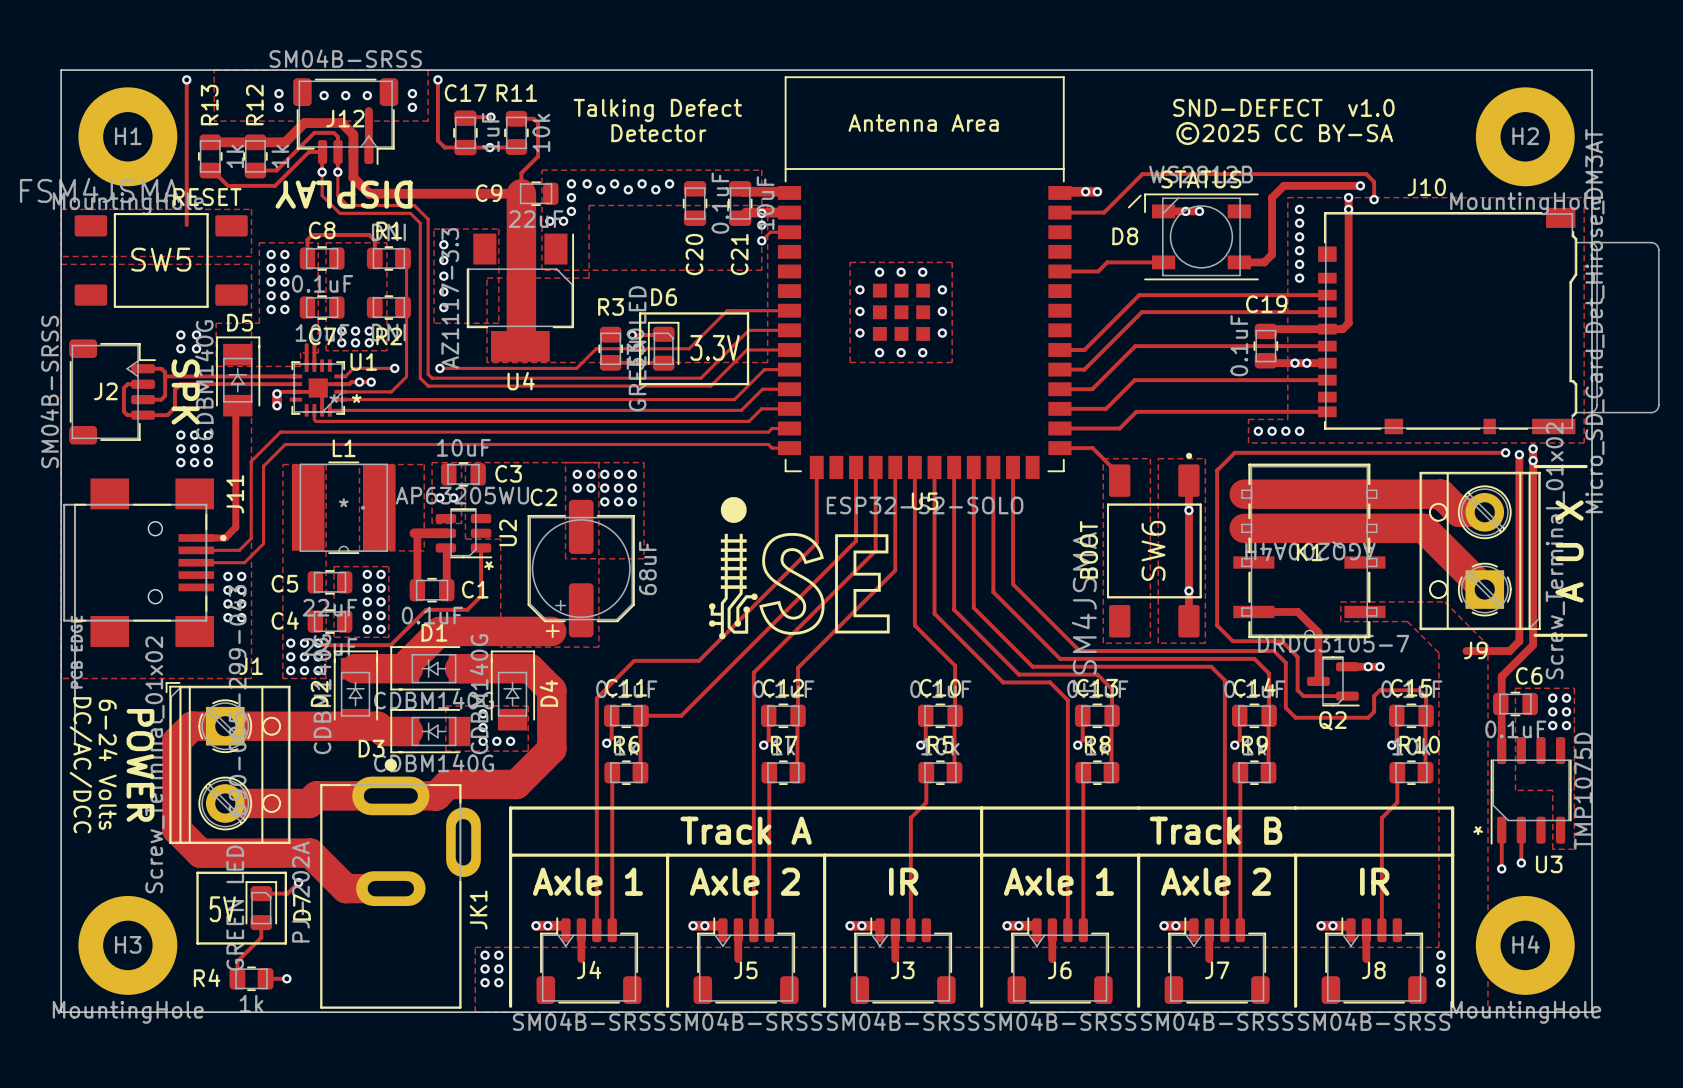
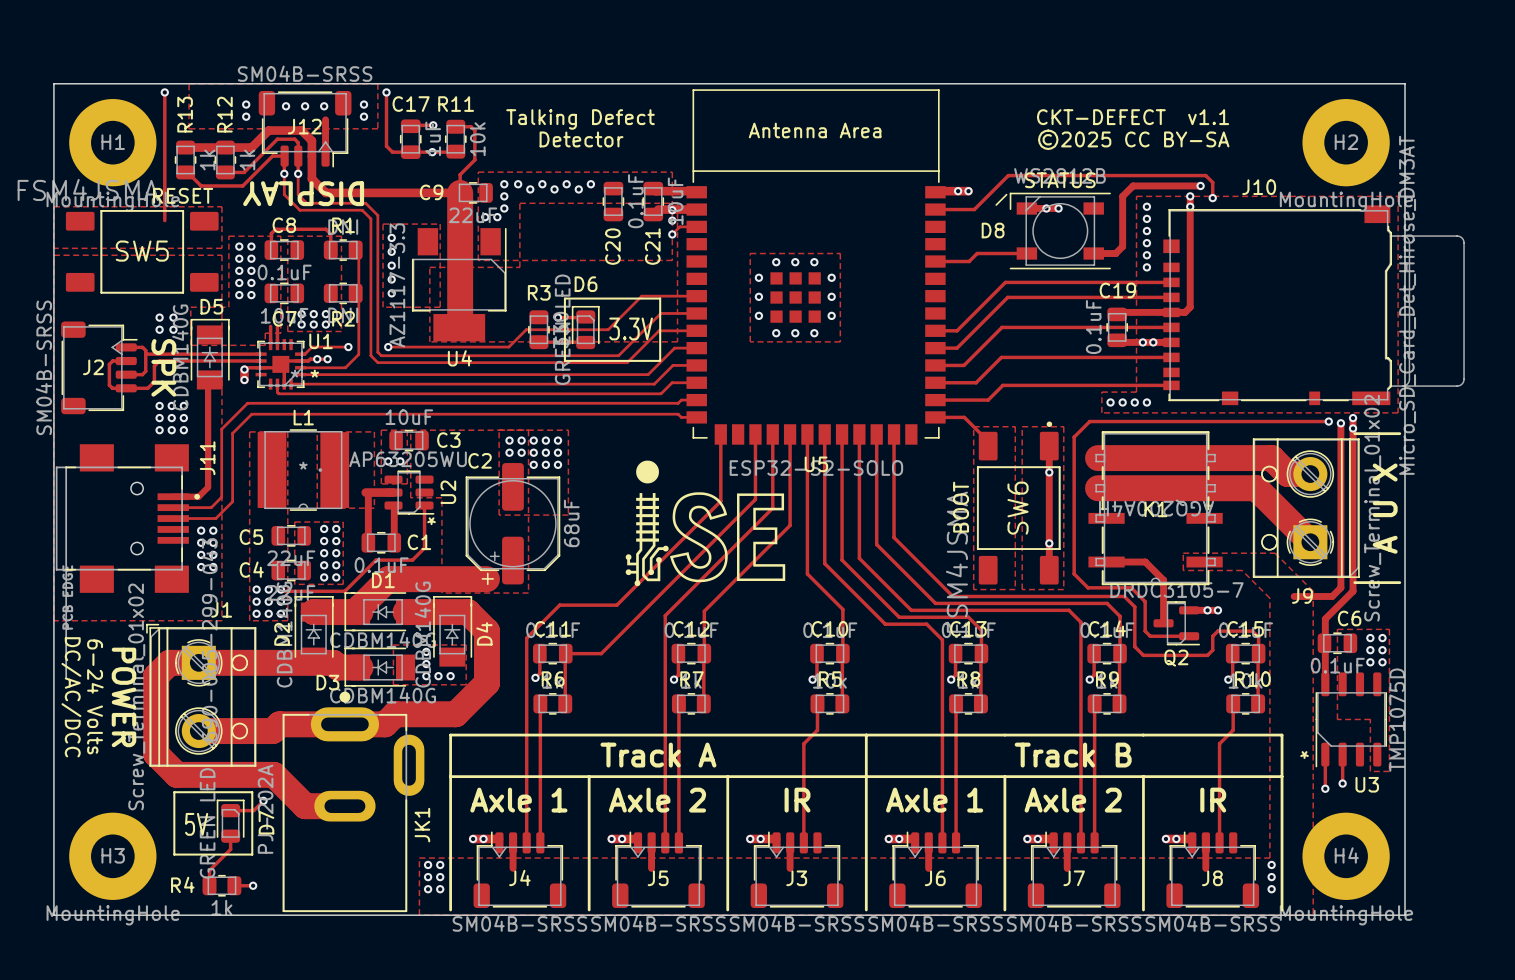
text: SND-DEFECT v1.0 (1283, 107) -> CKT-DEFECT v1.1 (1133, 117)

